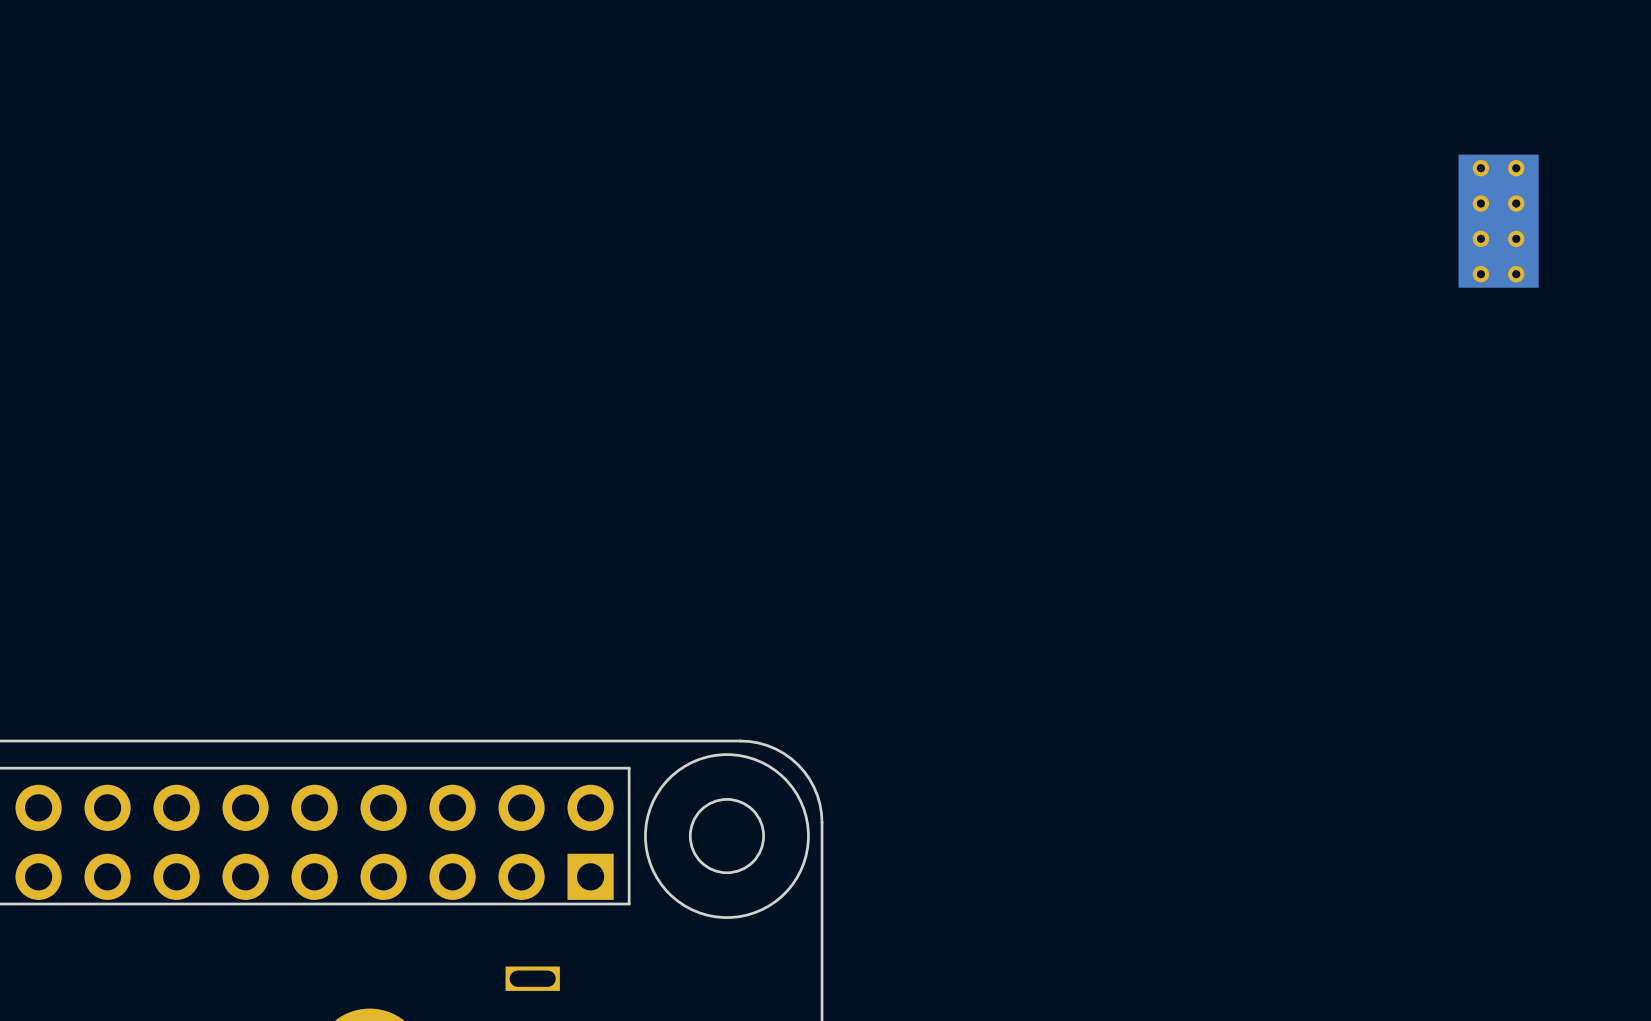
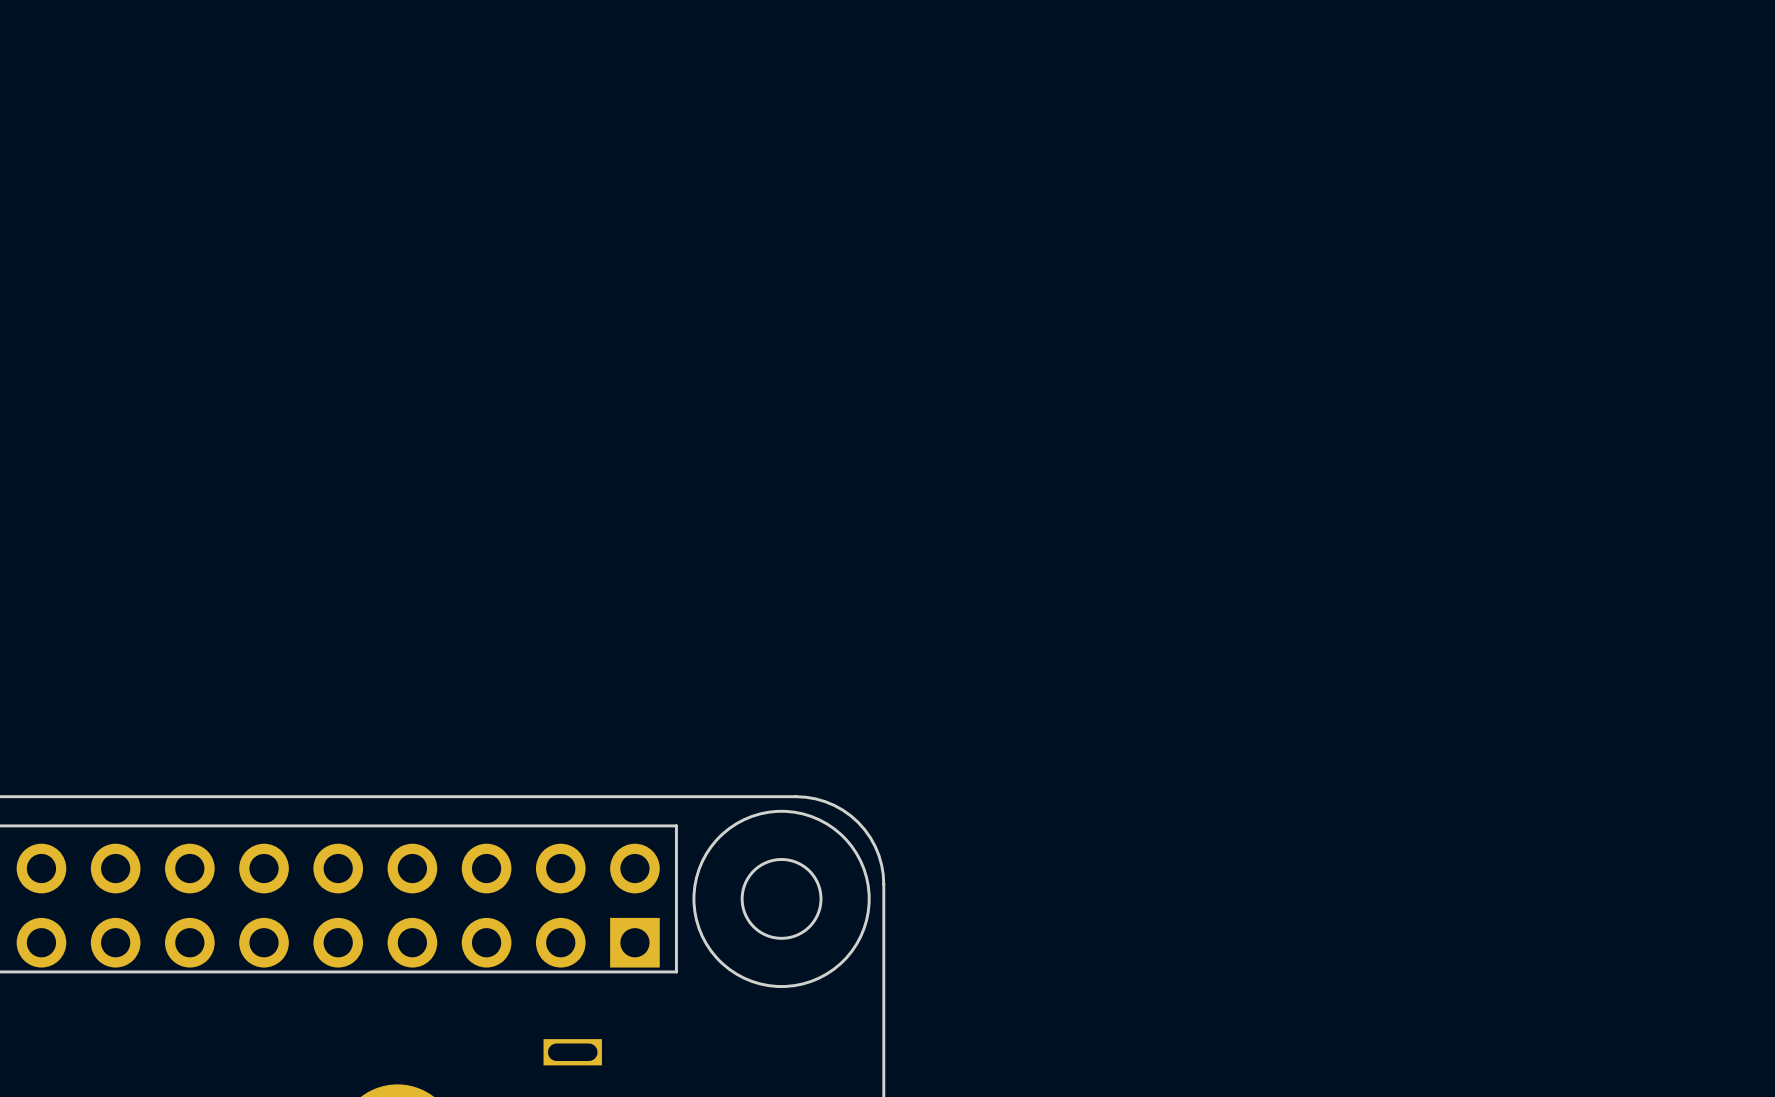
part: (1498, 221) -> none

